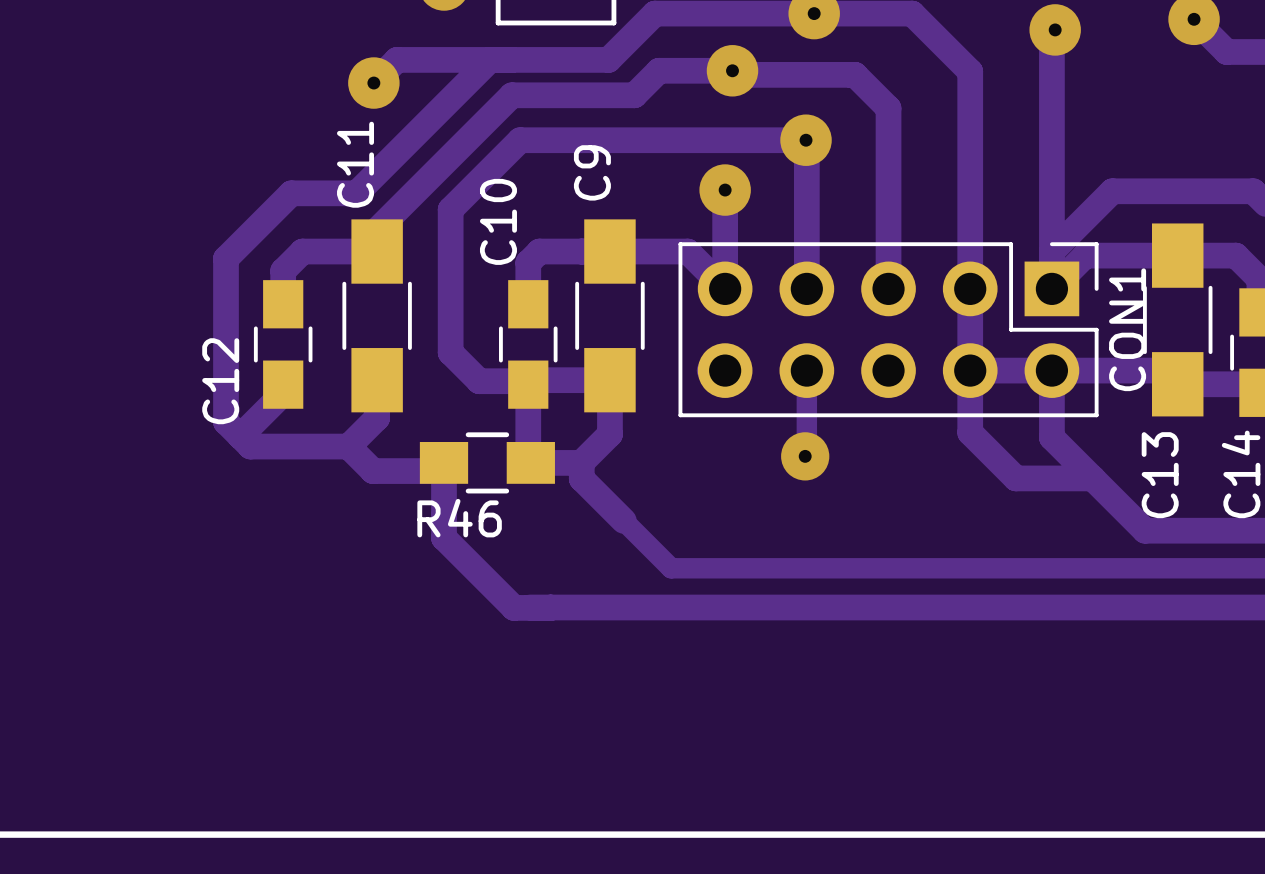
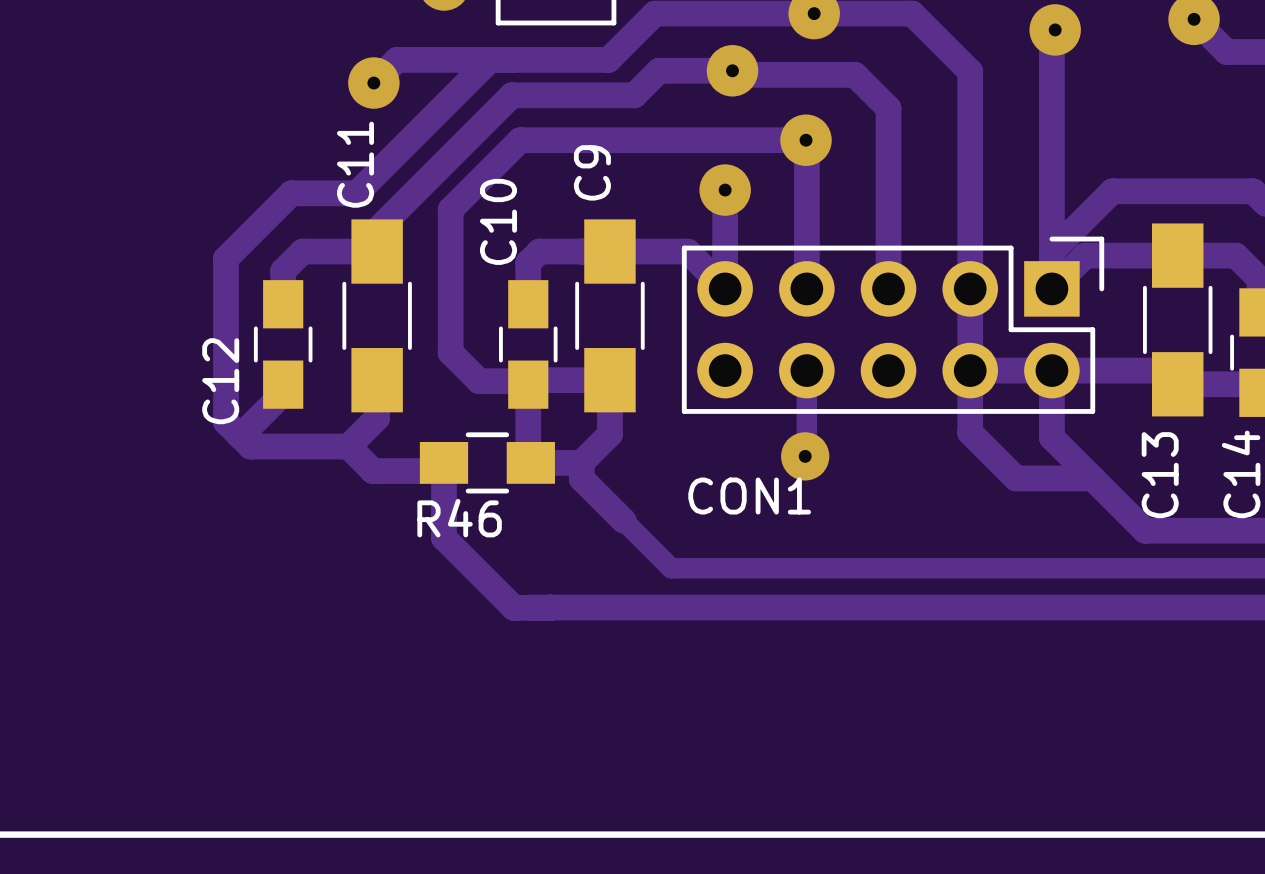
CON1 footprint: [678, 242, 1099, 418] -> [681, 236, 1105, 414]
CON1 name rotation: 0° (1127, 329) -> 90° clockwise (749, 496)
CON1 name position: CON1 (1127, 329) -> CON1 (749, 496)

